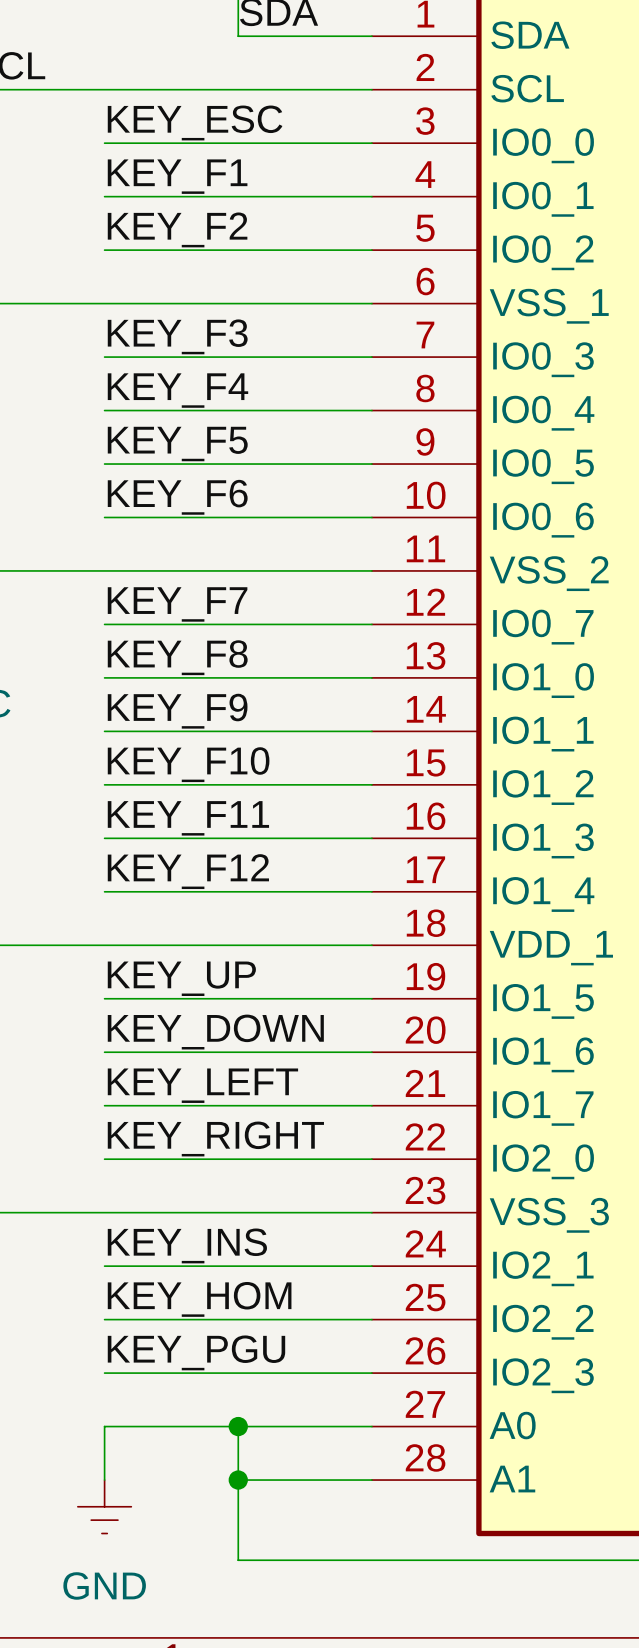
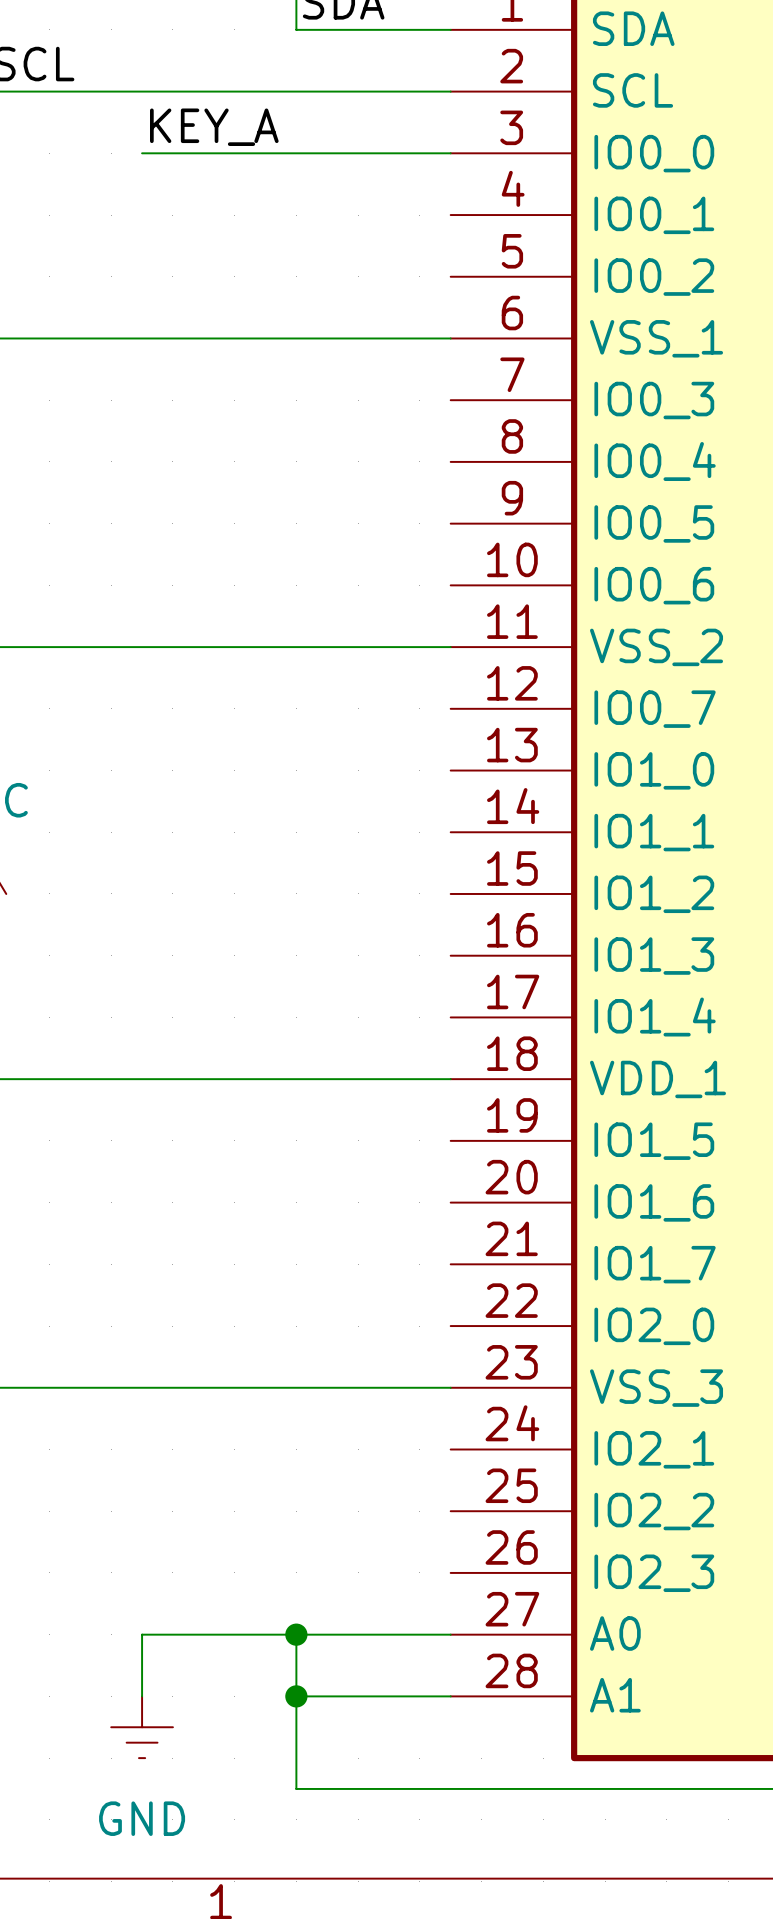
label: KEY_ESC (195, 122) -> KEY_A (214, 127)
label: KEY_F1 (177, 176) -> none
wire: (104, 196) (371, 196) -> none
label: KEY_F2 (177, 229) -> none
wire: (104, 250) (371, 250) -> none
label: KEY_F3 (177, 336) -> none
wire: (104, 357) (371, 357) -> none
label: KEY_F4 (177, 390) -> none
wire: (104, 410) (371, 410) -> none
label: KEY_F5 (177, 444) -> none
wire: (104, 464) (371, 464) -> none
label: KEY_F6 (177, 497) -> none
wire: (104, 517) (371, 517) -> none
label: KEY_F7 (177, 604) -> none
wire: (104, 624) (371, 624) -> none
label: KEY_F8 (177, 657) -> none
wire: (104, 677) (371, 677) -> none
label: KEY_F9 (177, 711) -> none
wire: (104, 731) (371, 731) -> none
label: KEY_F10 (188, 764) -> none
wire: (104, 784) (371, 784) -> none
label: KEY_F11 (188, 818) -> none
wire: (104, 838) (371, 838) -> none
label: KEY_F12 (188, 871) -> none
wire: (104, 891) (371, 891) -> none
label: KEY_UP (181, 978) -> none
wire: (104, 998) (371, 998) -> none
label: KEY_DOWN (215, 1032) -> none
wire: (104, 1052) (371, 1052) -> none
label: KEY_LEFT (202, 1085) -> none
wire: (104, 1105) (371, 1105) -> none
label: KEY_RIGHT (215, 1138) -> none
wire: (104, 1159) (371, 1159) -> none
label: KEY_INS (187, 1245) -> none
wire: (104, 1266) (371, 1266) -> none
label: KEY_HOM (199, 1299) -> none
wire: (104, 1319) (371, 1319) -> none
label: KEY_PGU (196, 1352) -> none
wire: (104, 1373) (371, 1373) -> none

